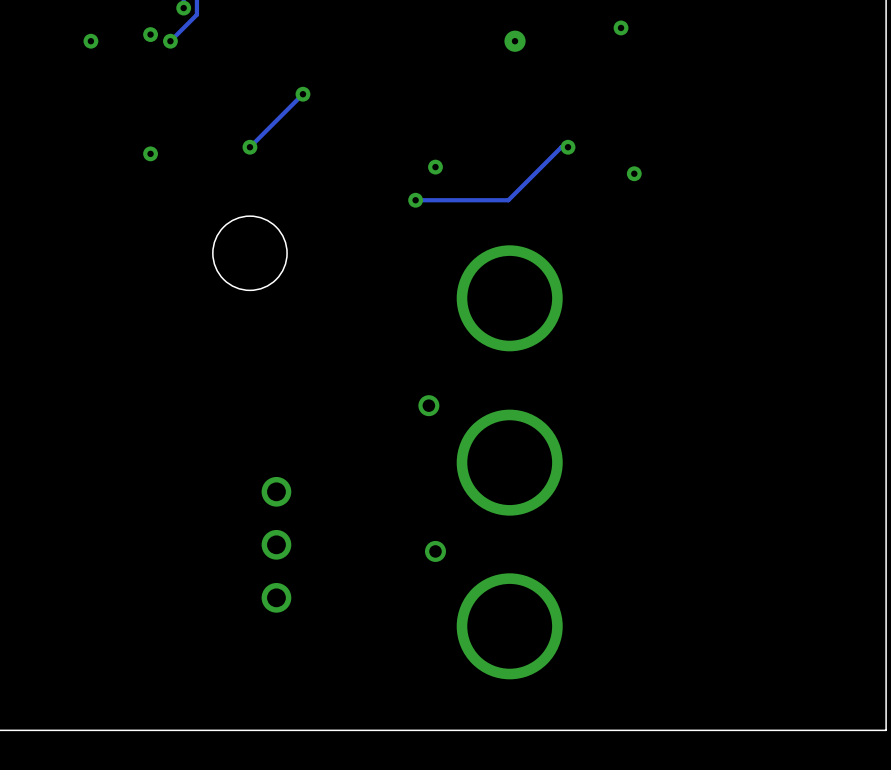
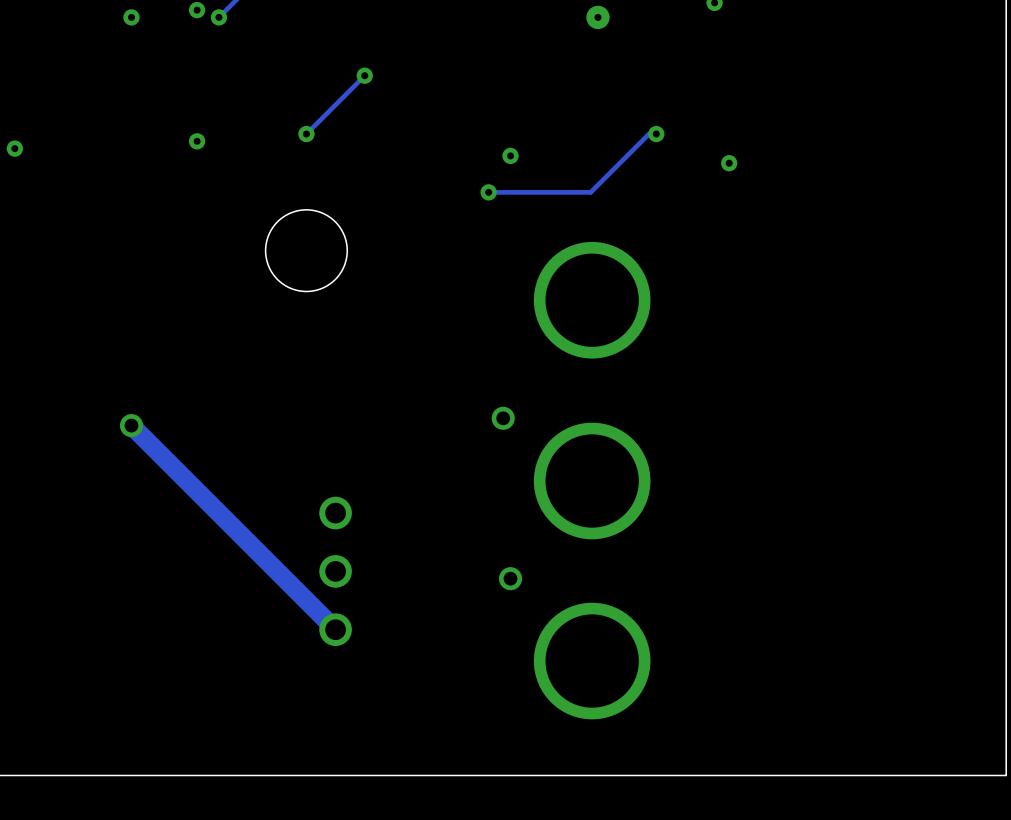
track: none -> (131, 425) (335, 629)
via: none -> (131, 425)

